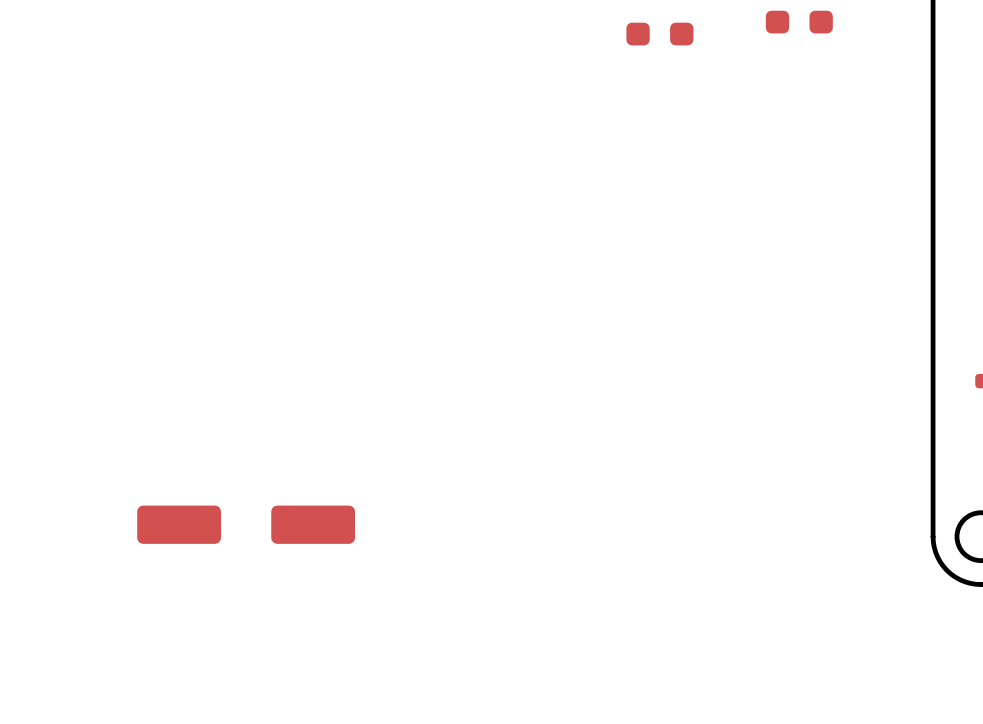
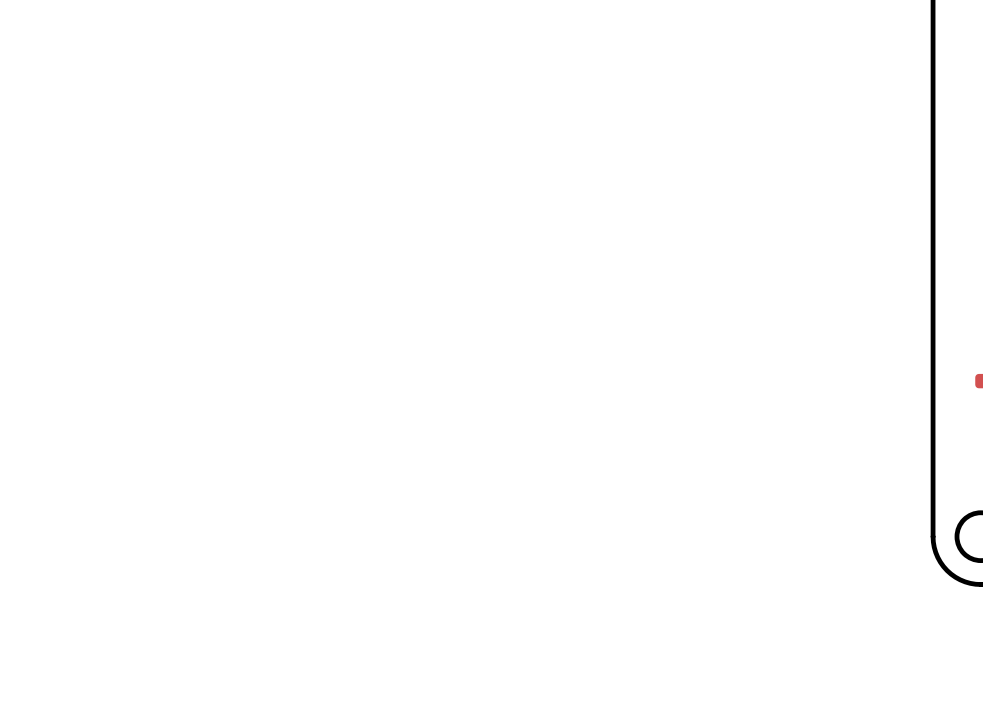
part: (799, 22) -> none
part: (659, 34) -> none
part: (246, 524) -> none

